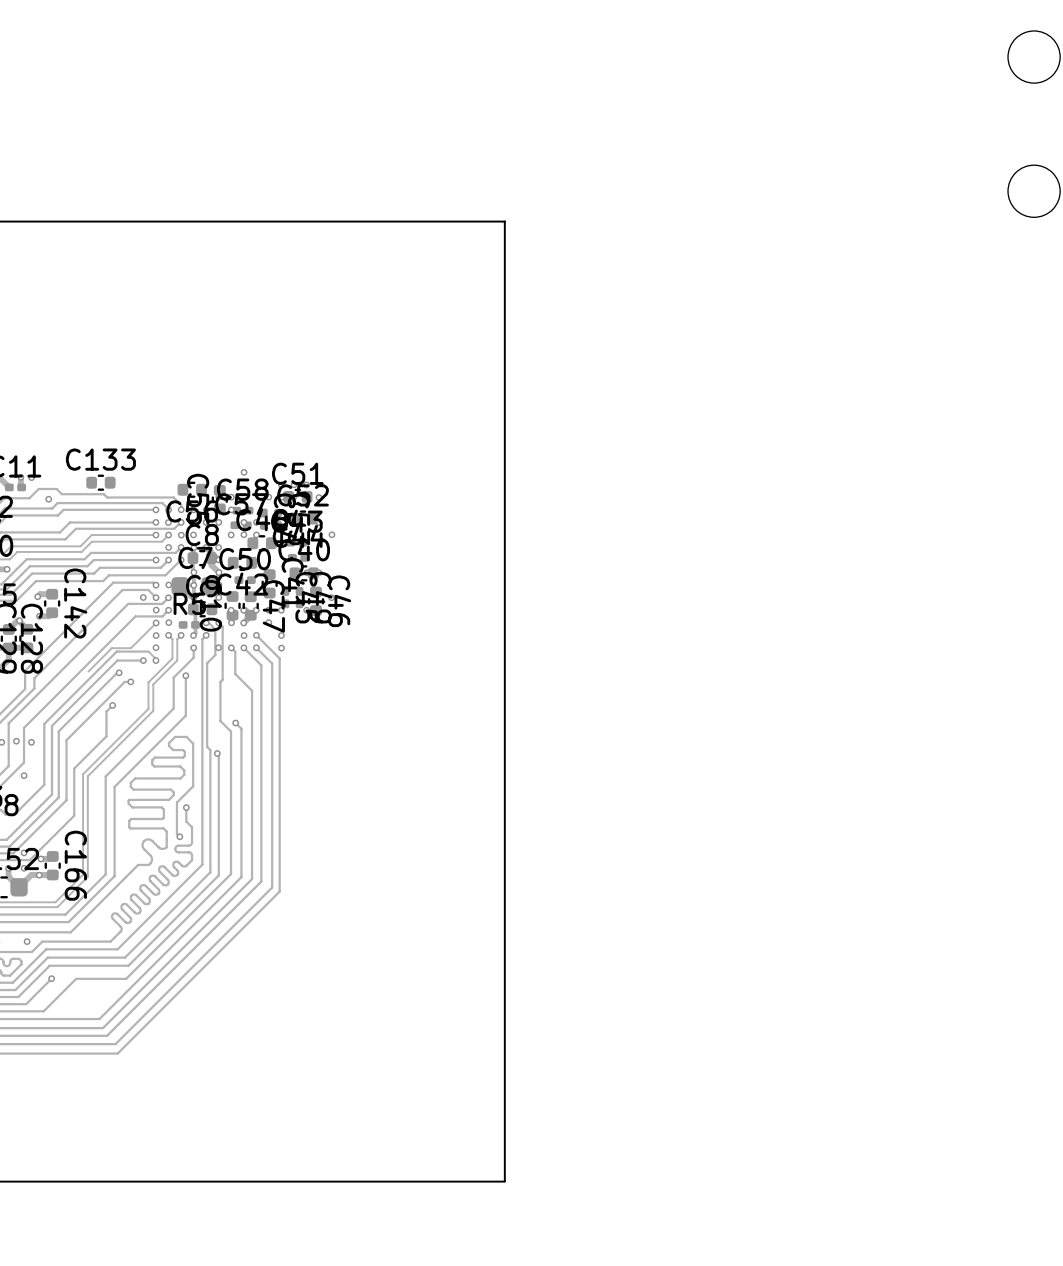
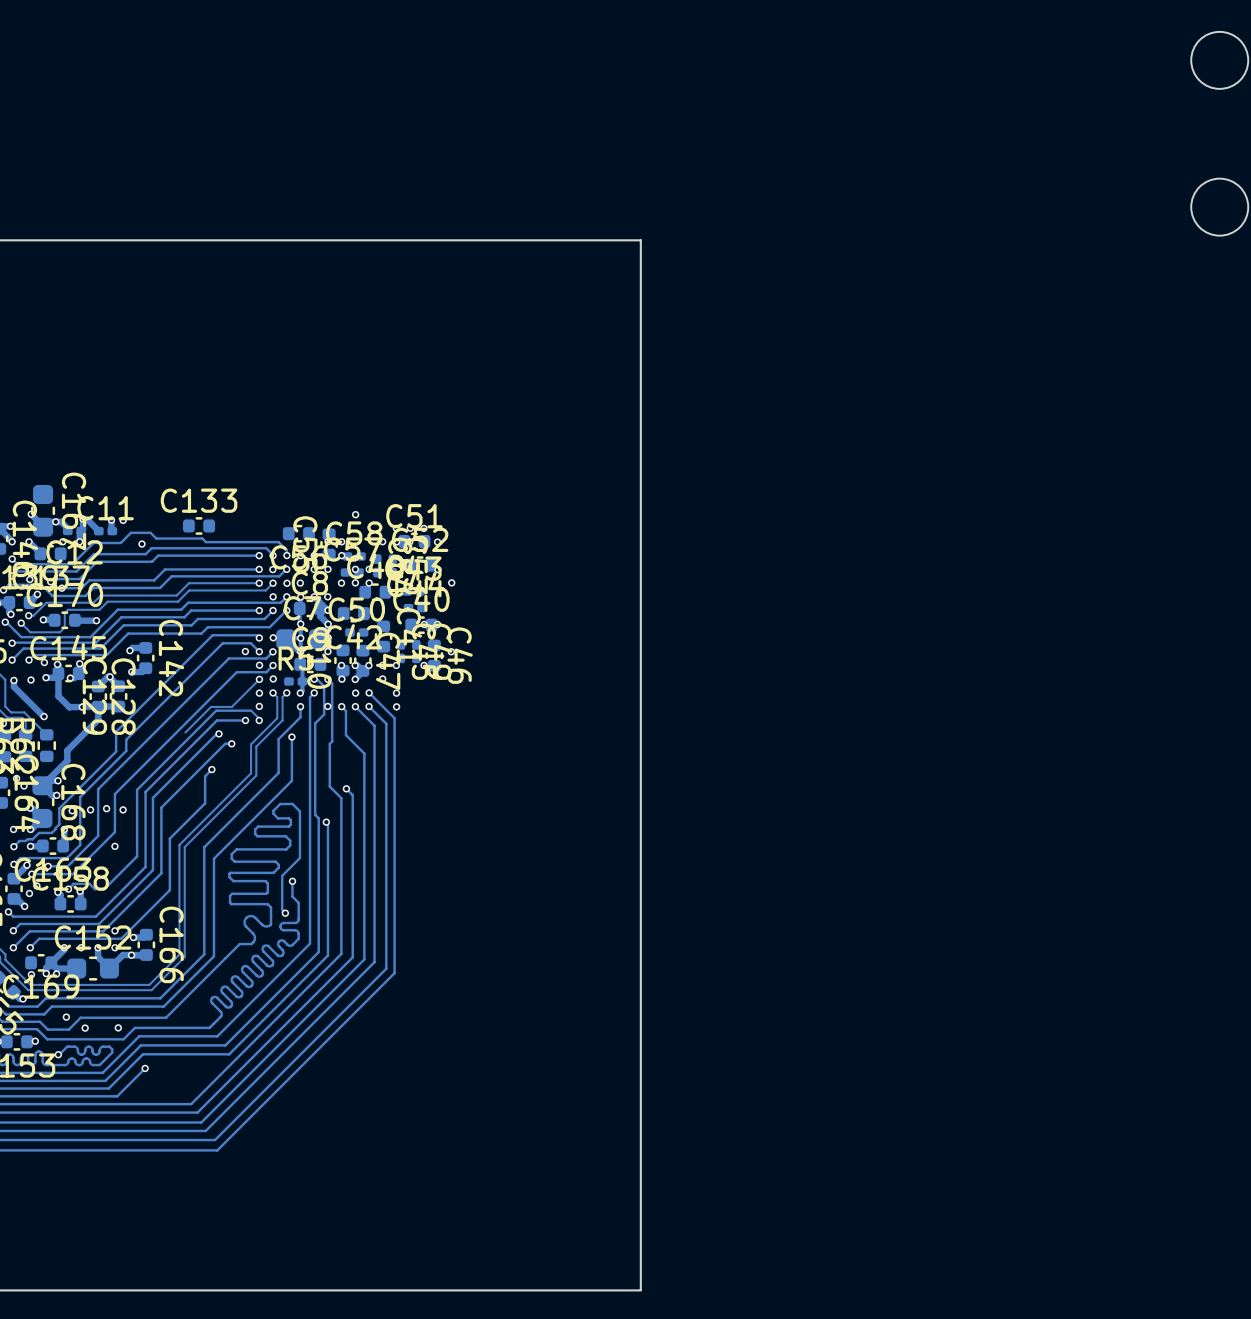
track: (126, 978) (76, 978) (43, 1011) -> (226, 1068) (191, 1104) (136, 1104)

